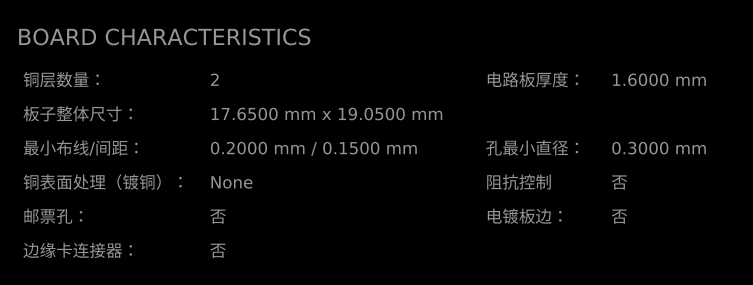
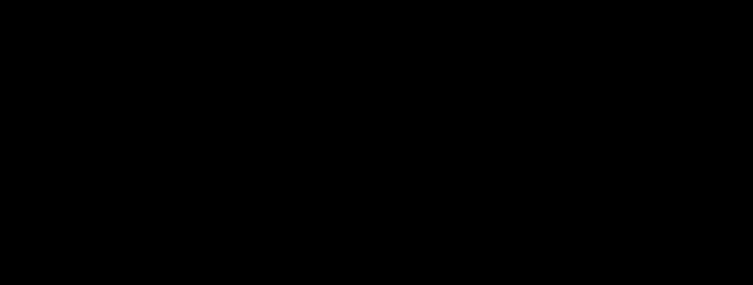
text: BOARD CHARACTERISTICS (164, 36) -> none
text: 铜层数量： (61, 79) -> none
text: 2 (214, 79) -> none
text: 电路板厚度： (532, 79) -> none
text: 1.6000 mm (659, 79) -> none
text: 板子整体尺寸： (77, 113) -> none
text: 17.6500 mm x 19.0500 mm (326, 114) -> none
text: 孔最小直径： (532, 147) -> none
text: 最小布线/间距： (80, 148) -> none
text: 0.2000 mm / 0.1500 mm (313, 148) -> none
text: 0.3000 mm (659, 148) -> none
text: 铜表面处理（镀铜）： (102, 182) -> none
text: None (231, 182) -> none
text: 阻抗控制 (519, 182) -> none
text: 否 (619, 182) -> none
text: 邮票孔： (53, 216) -> none
text: 否 (218, 216) -> none
text: 电镀板边： (524, 216) -> none
text: 否 (619, 216) -> none
text: 边缘卡连接器： (77, 250) -> none
text: 否 (218, 250) -> none

